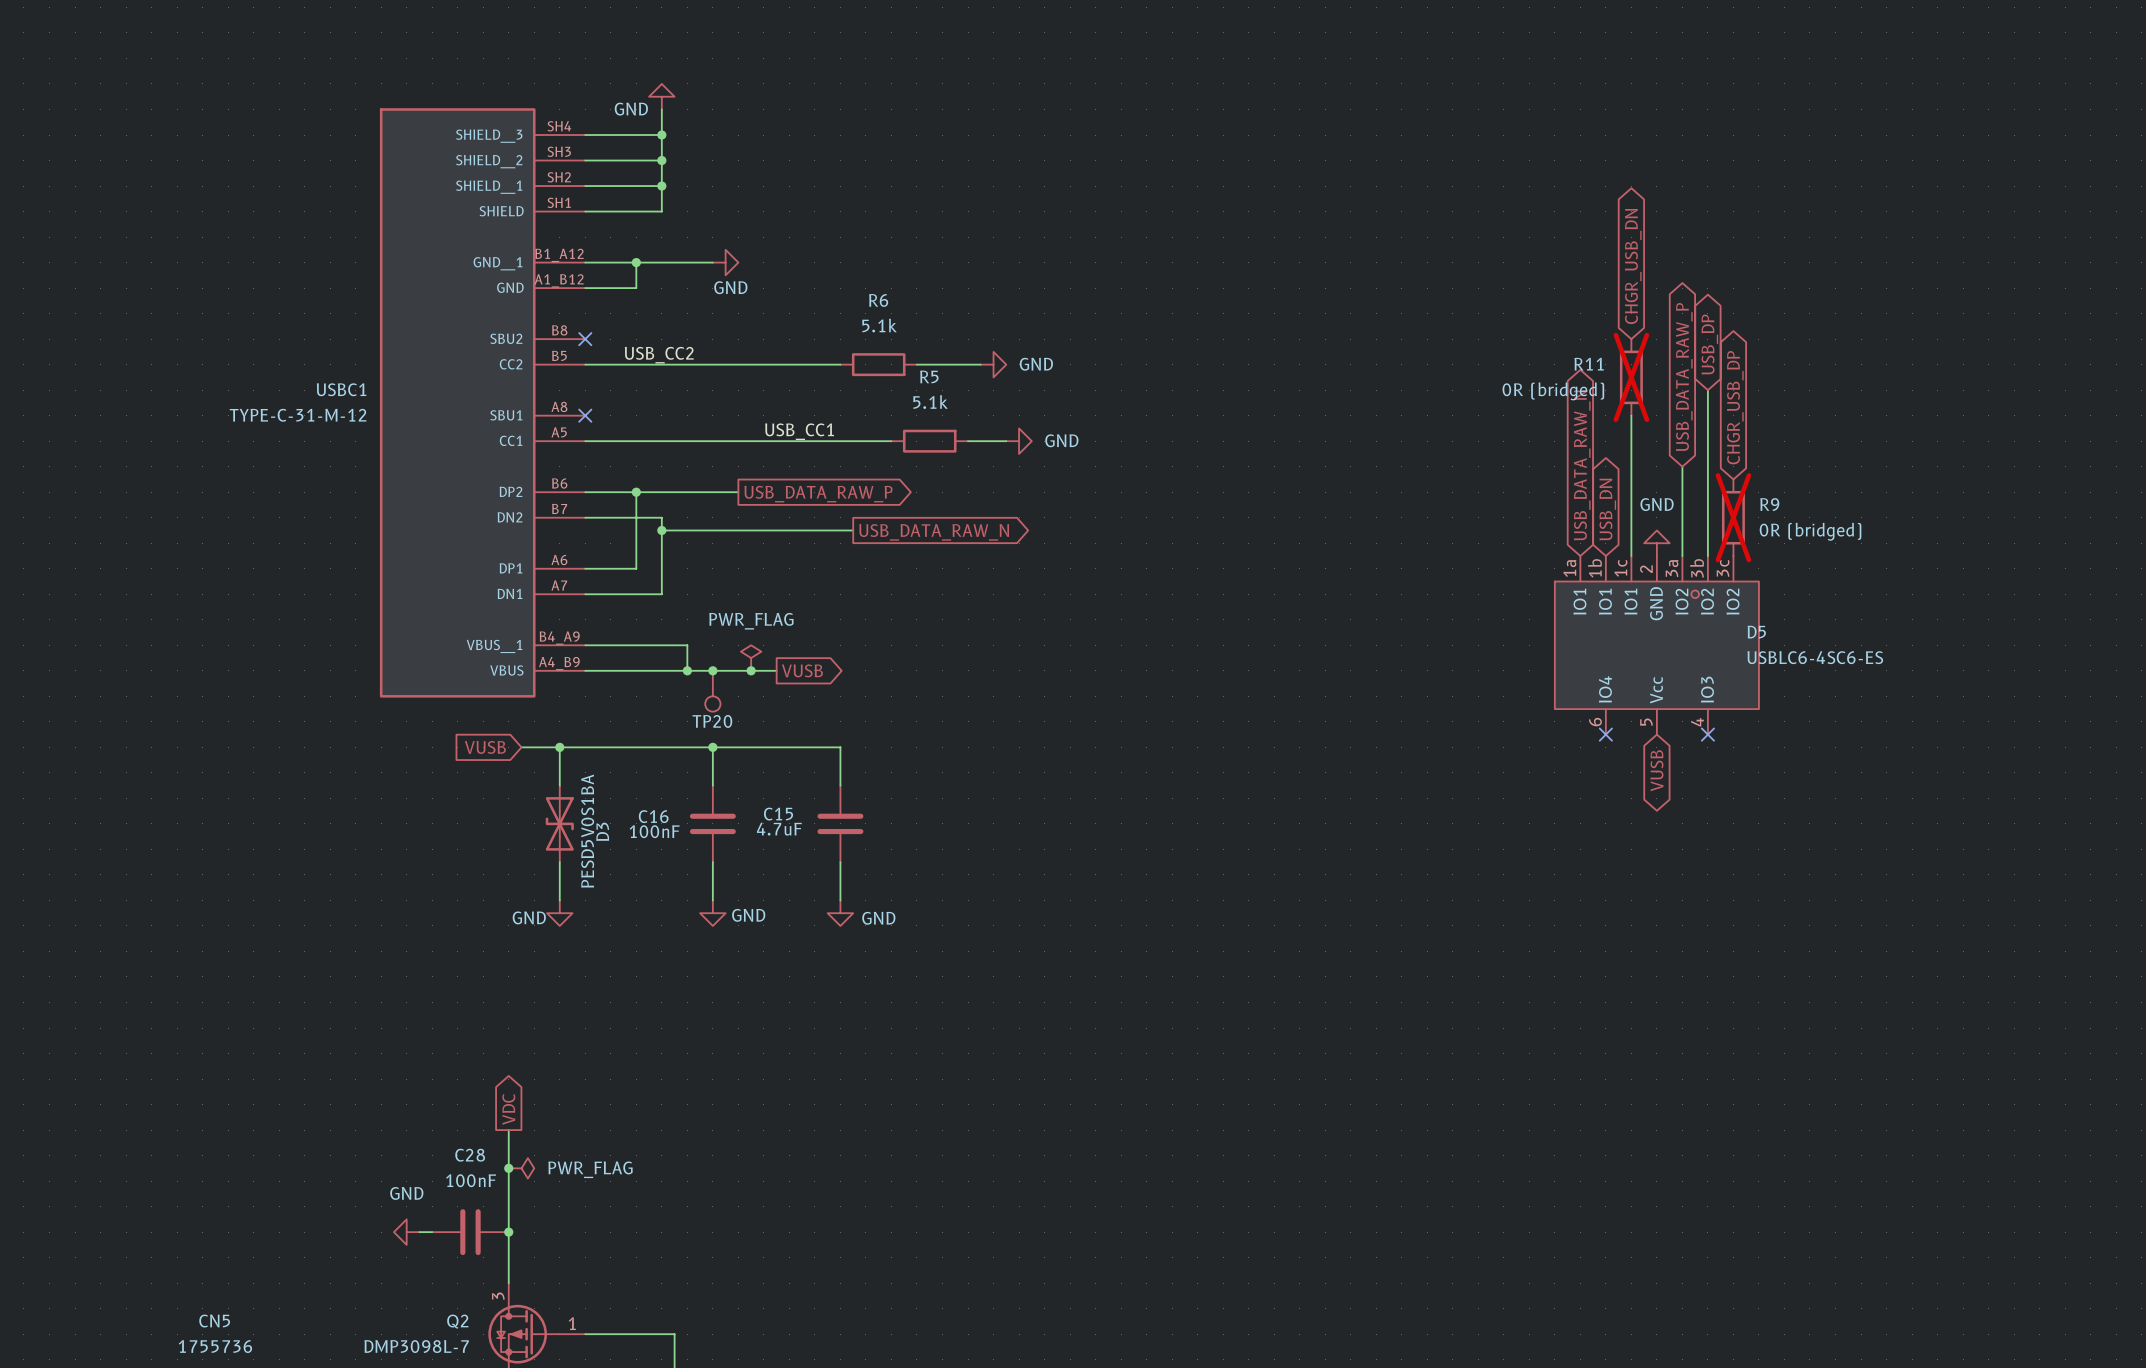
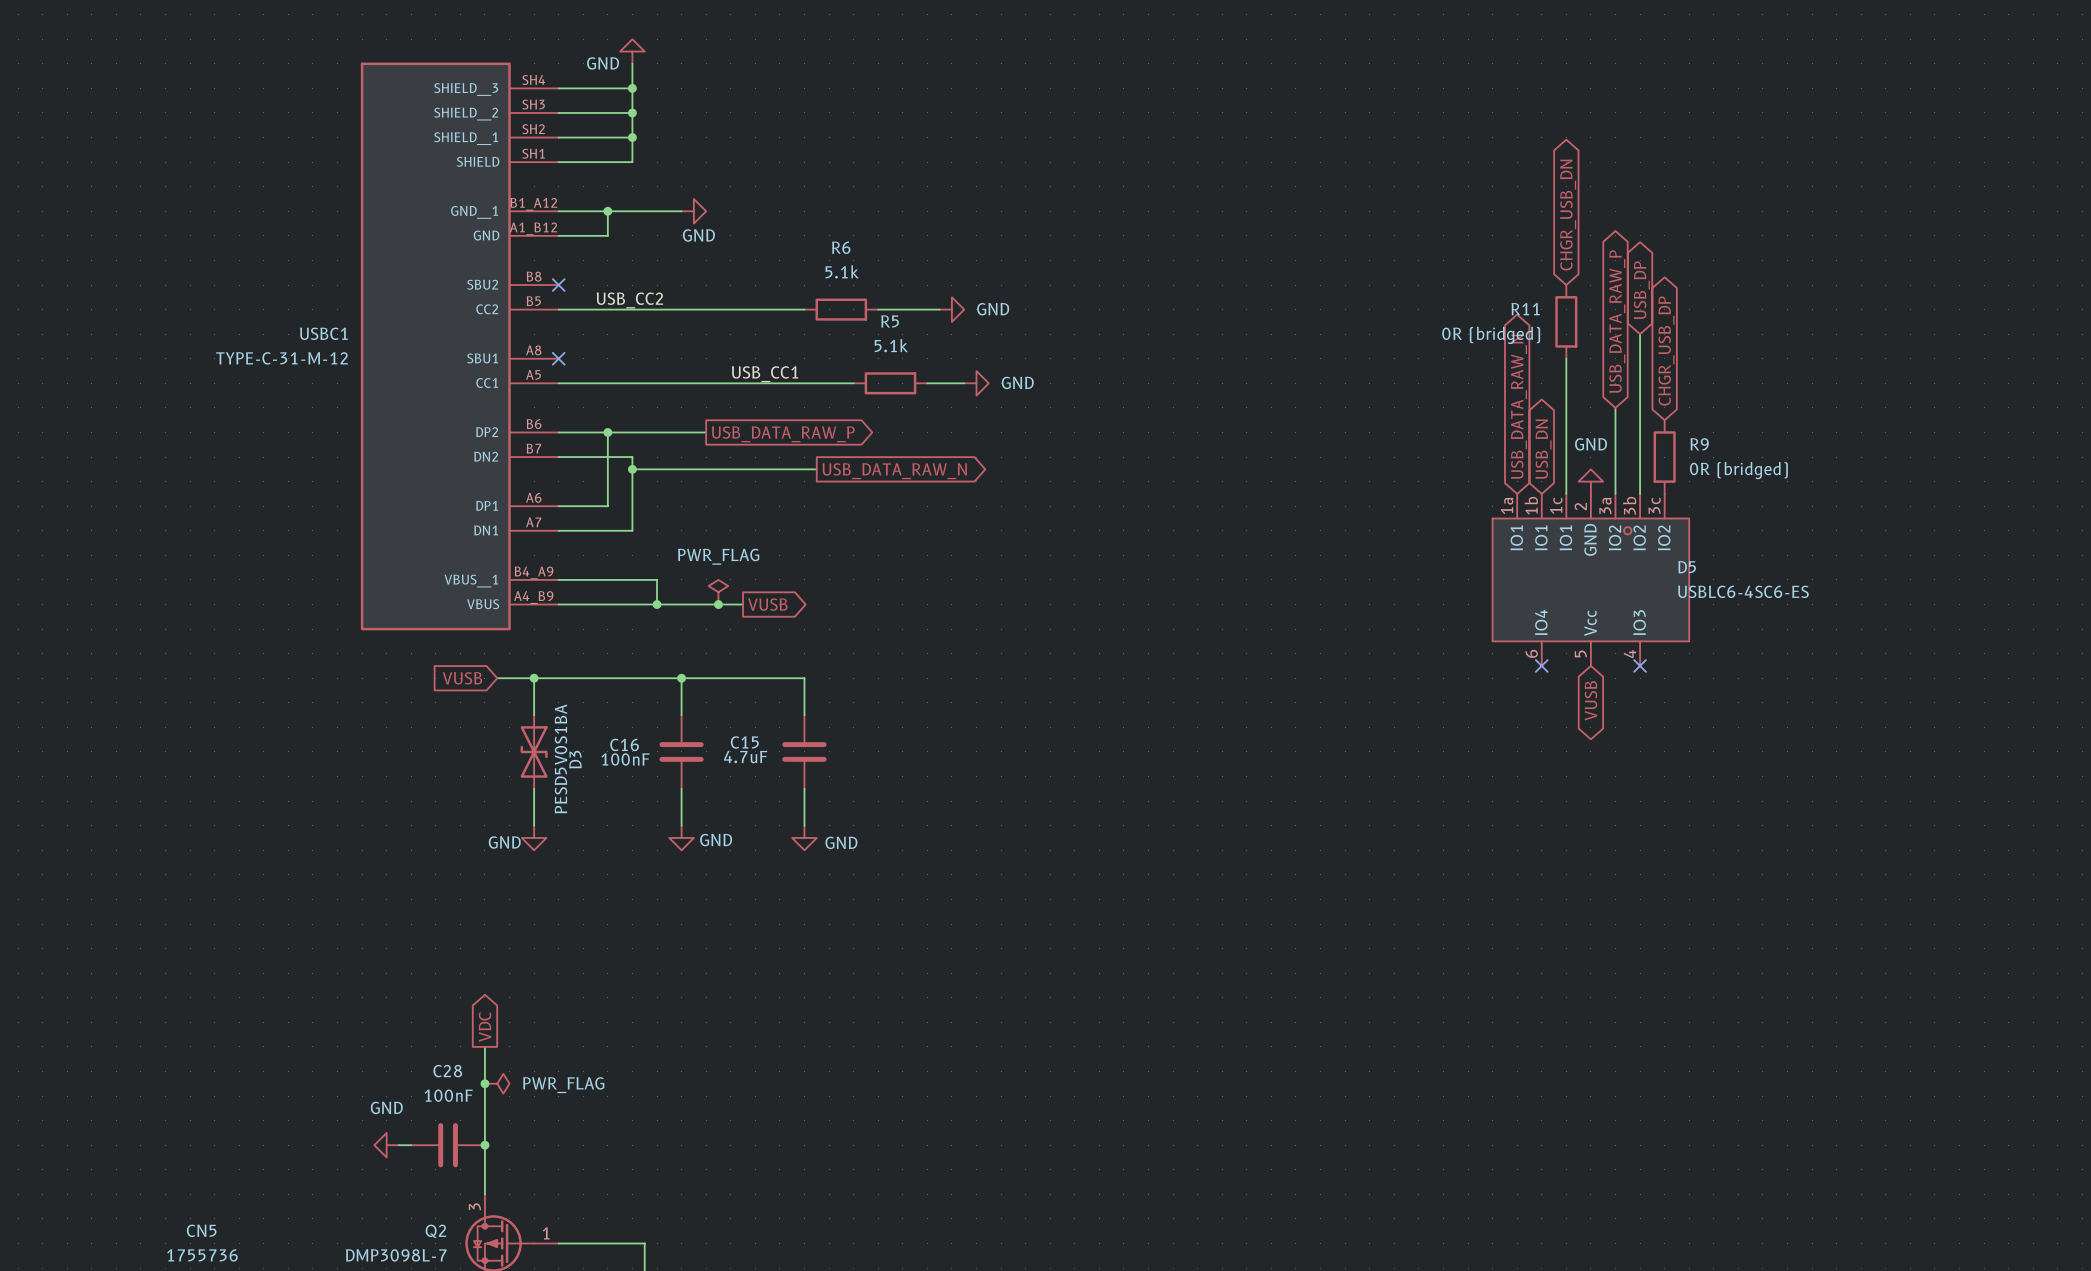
R11 do-not-place cross: (1631, 377) -> none
R9 do-not-place cross: (1733, 517) -> none
junction: (712, 670) -> none
TP20: (712, 691) -> none

